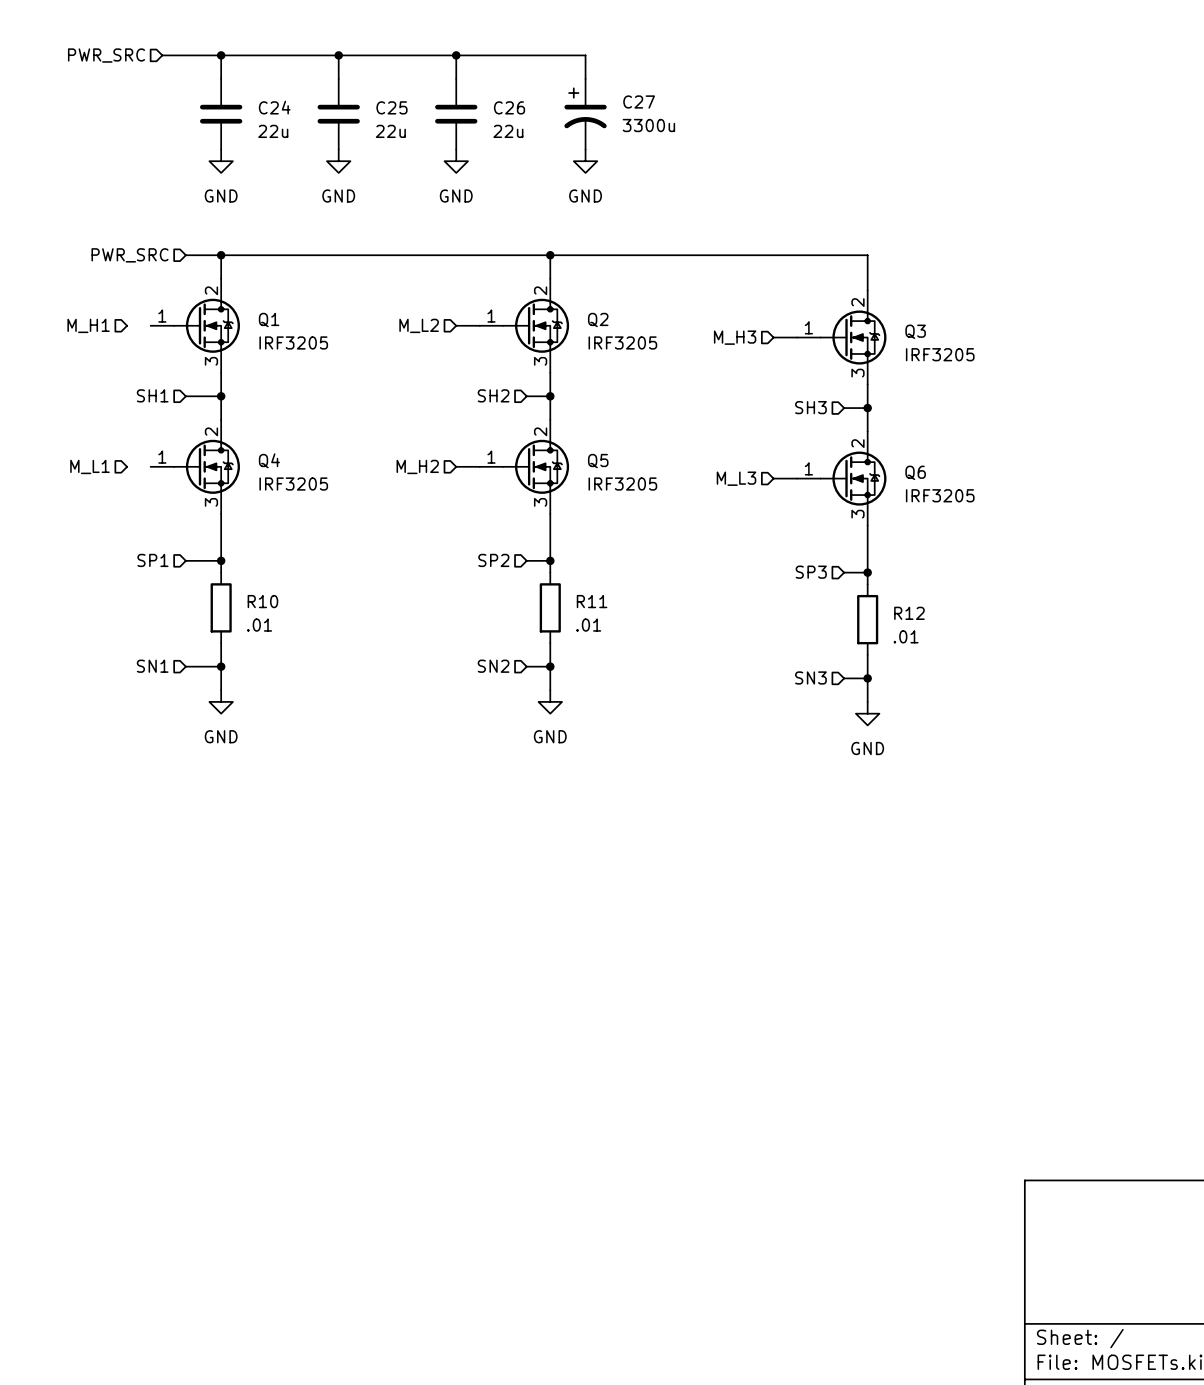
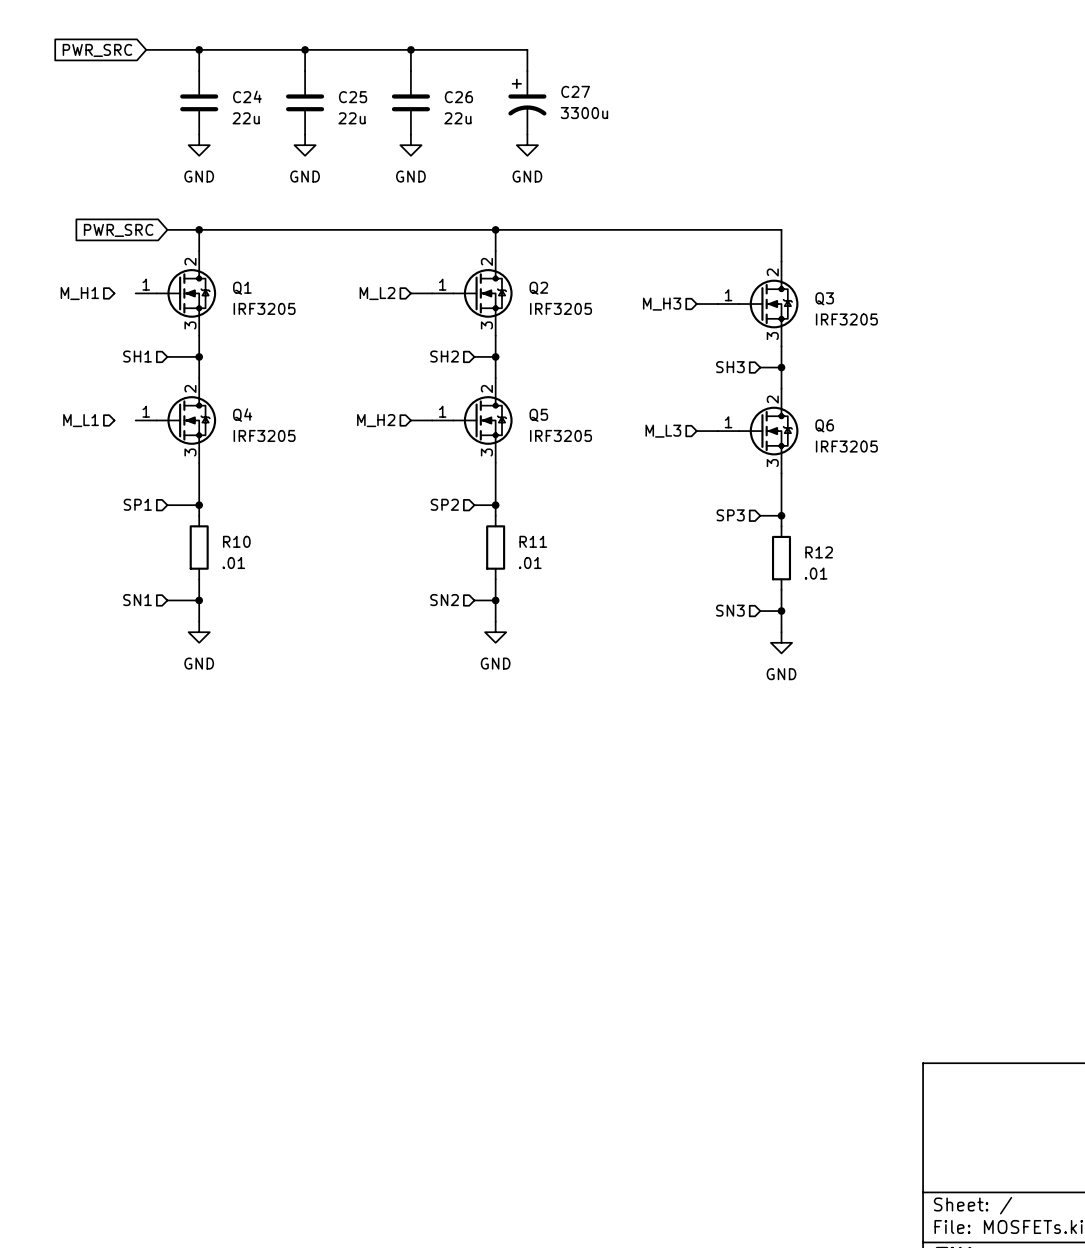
hierarchical label: PWR_SRC (106, 55) -> none
global label: none -> PWR_SRC (97, 50)
hierarchical label: PWR_SRC (130, 255) -> none
global label: none -> PWR_SRC (118, 230)

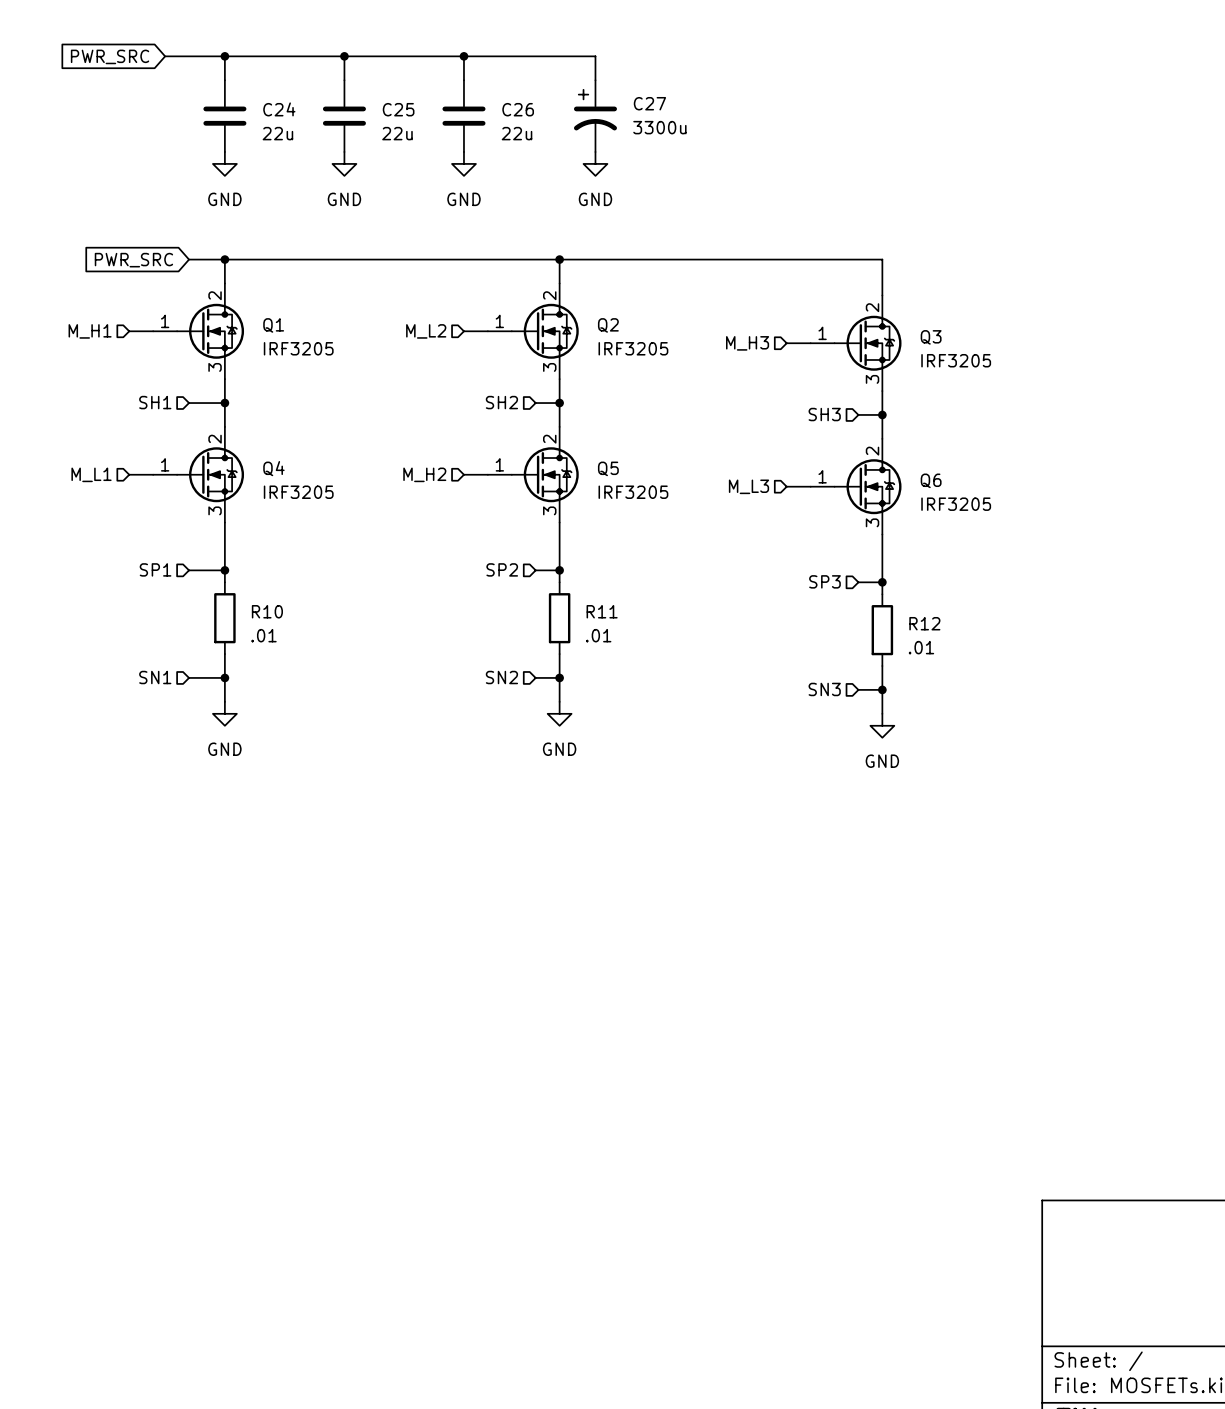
wire: none -> (129, 331) (153, 331)
wire: none -> (129, 474) (153, 474)

